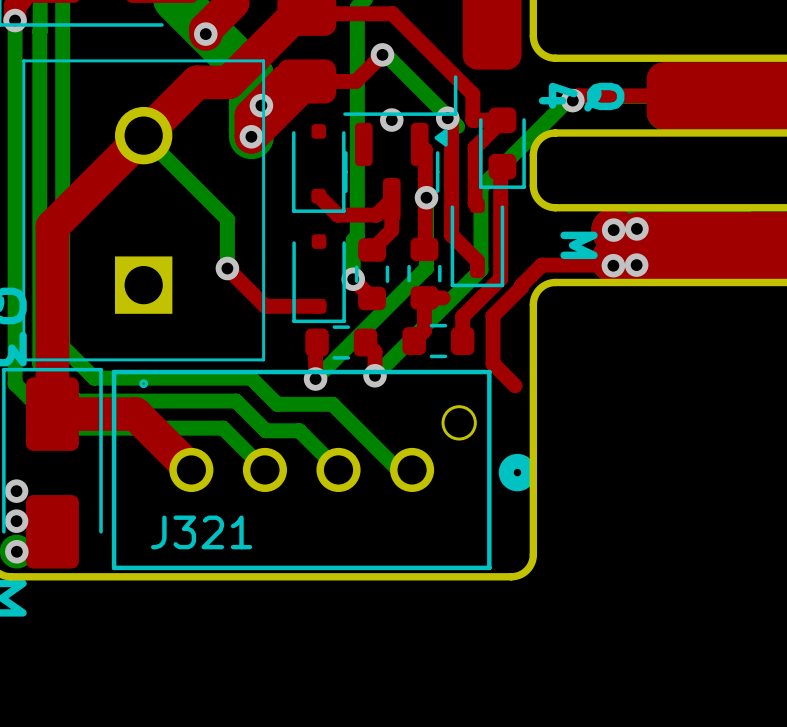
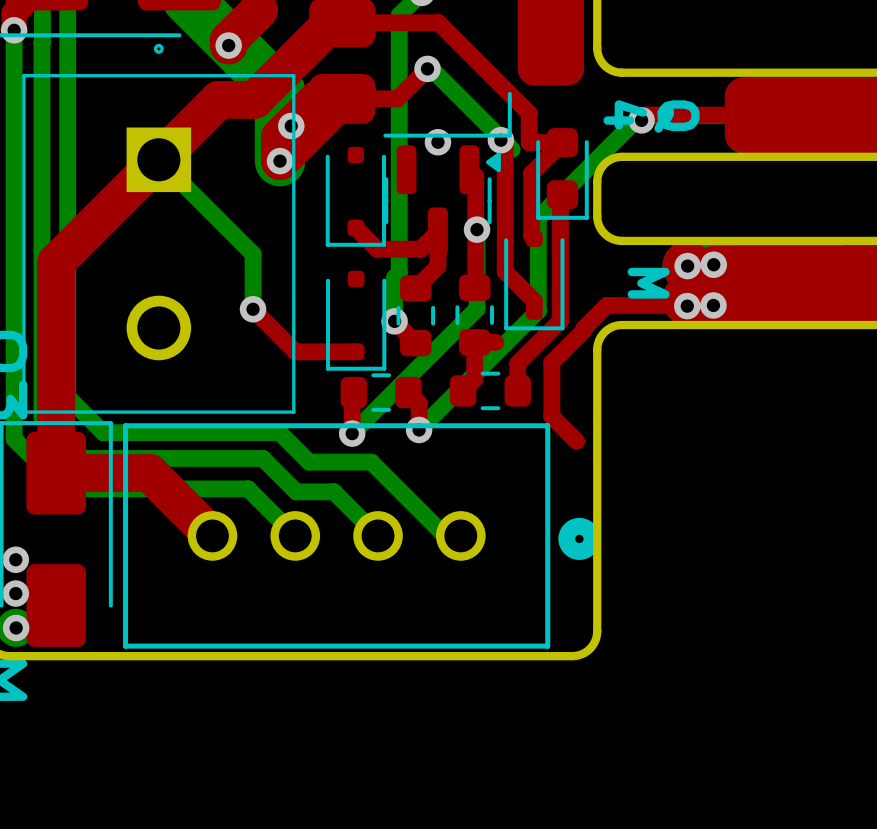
part rotation: 0° (143, 223) -> 180° (158, 228)
J321: (324, 469) -> none

